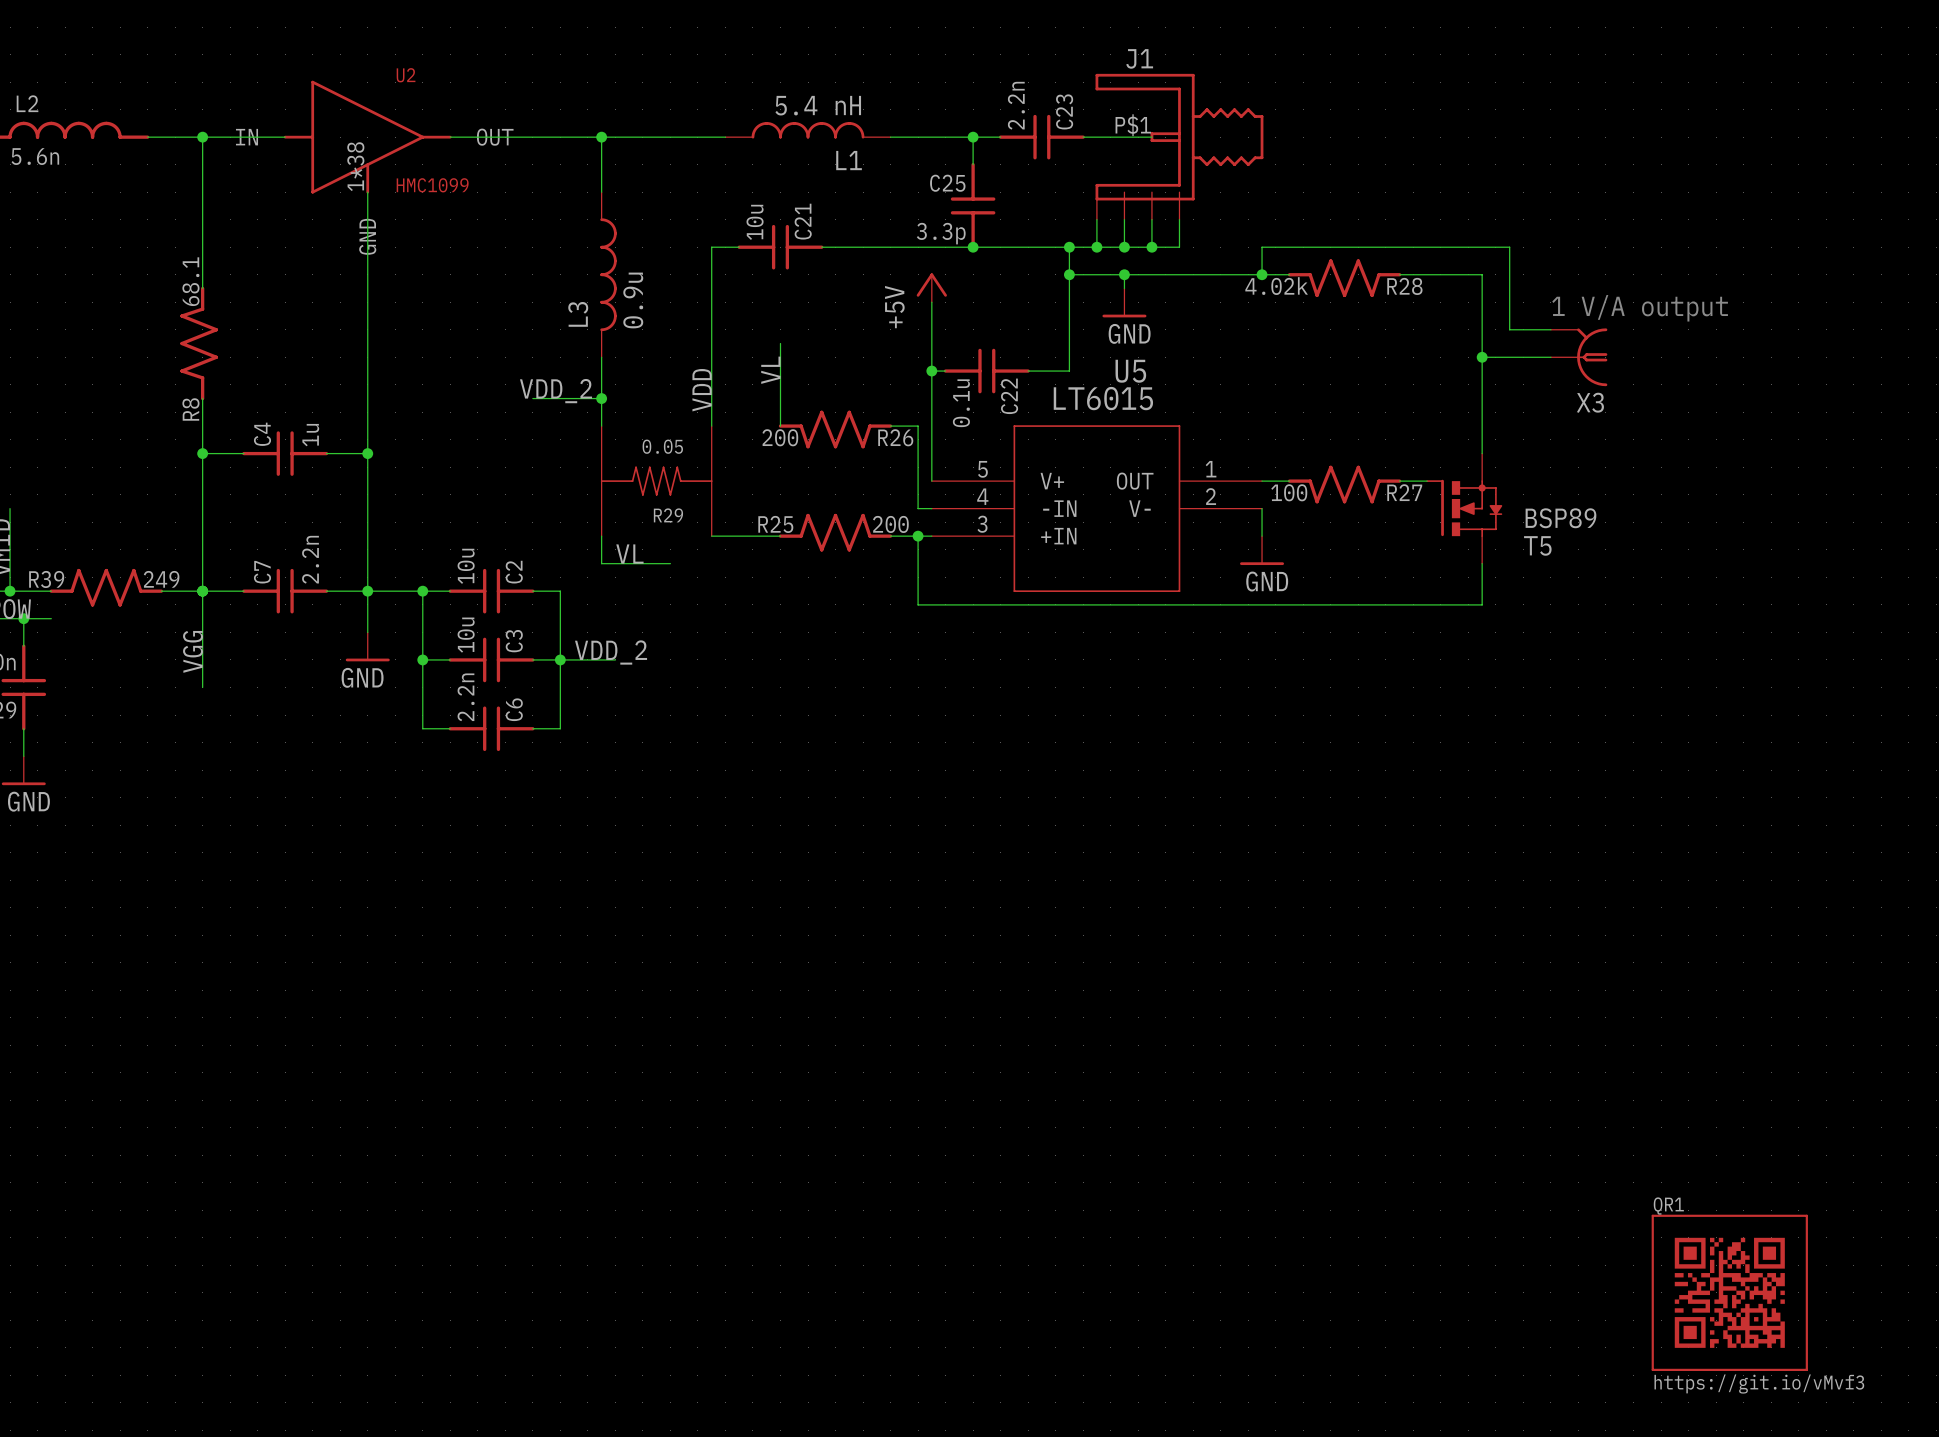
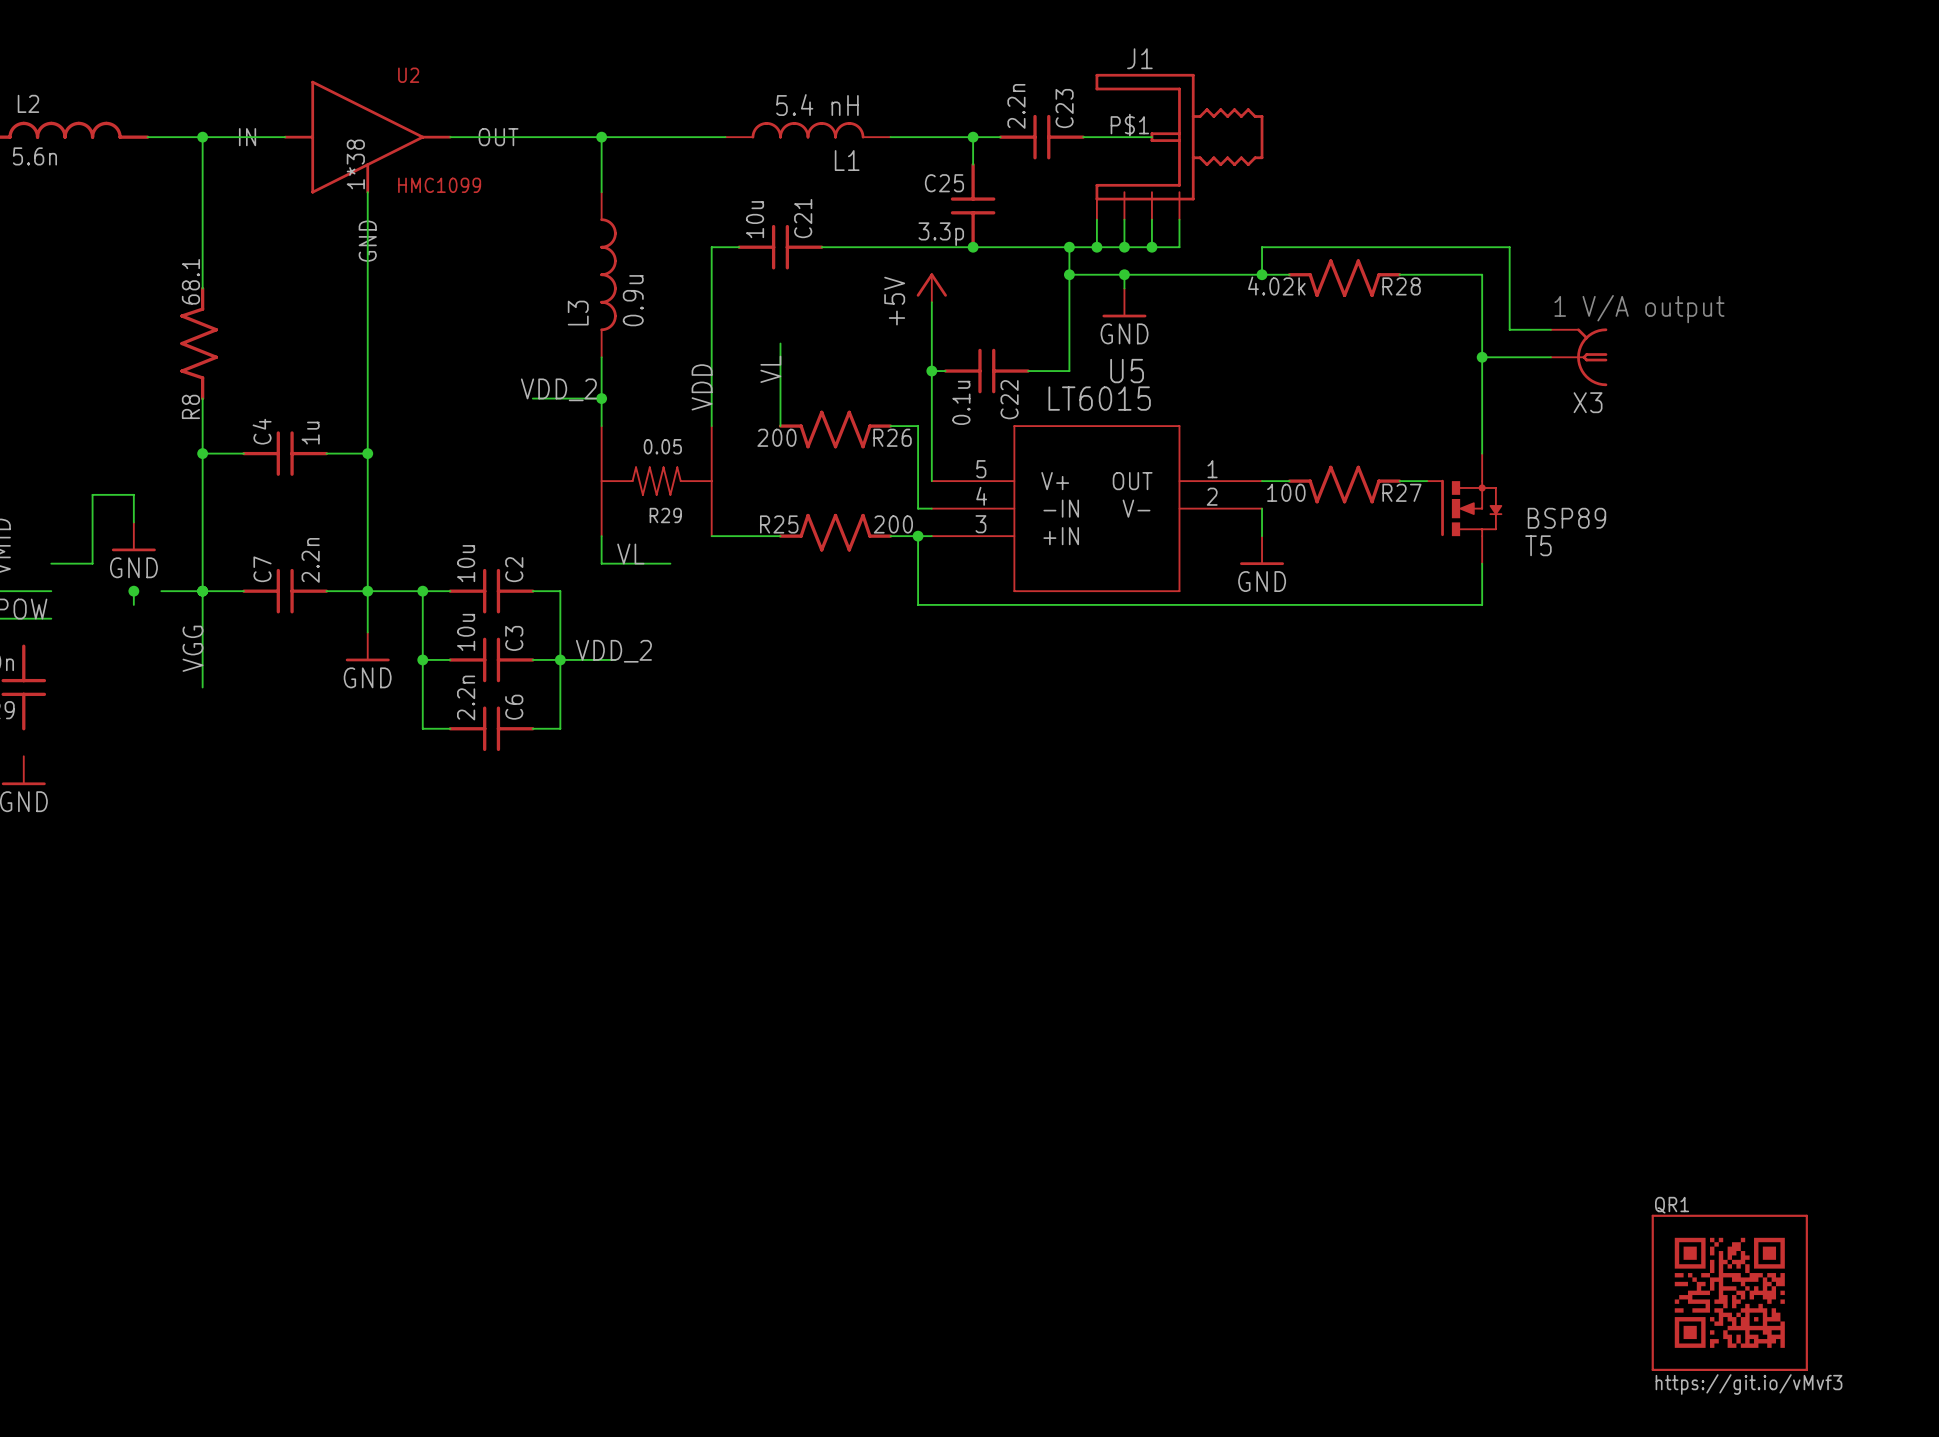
wire: (10, 508) (10, 591) -> none
wire: none -> (133, 522) (133, 494) (92, 494) (92, 563) (51, 563)
power symbol: none -> GND (133, 536)
R39: 249 (106, 587) -> none
junction: (10, 591) -> none
wire: none -> (133, 591) (133, 604)
junction: none -> (133, 591)
wire: (23, 618) (23, 646) -> none
junction: (23, 618) -> none
wire: (23, 728) (23, 756) -> none

